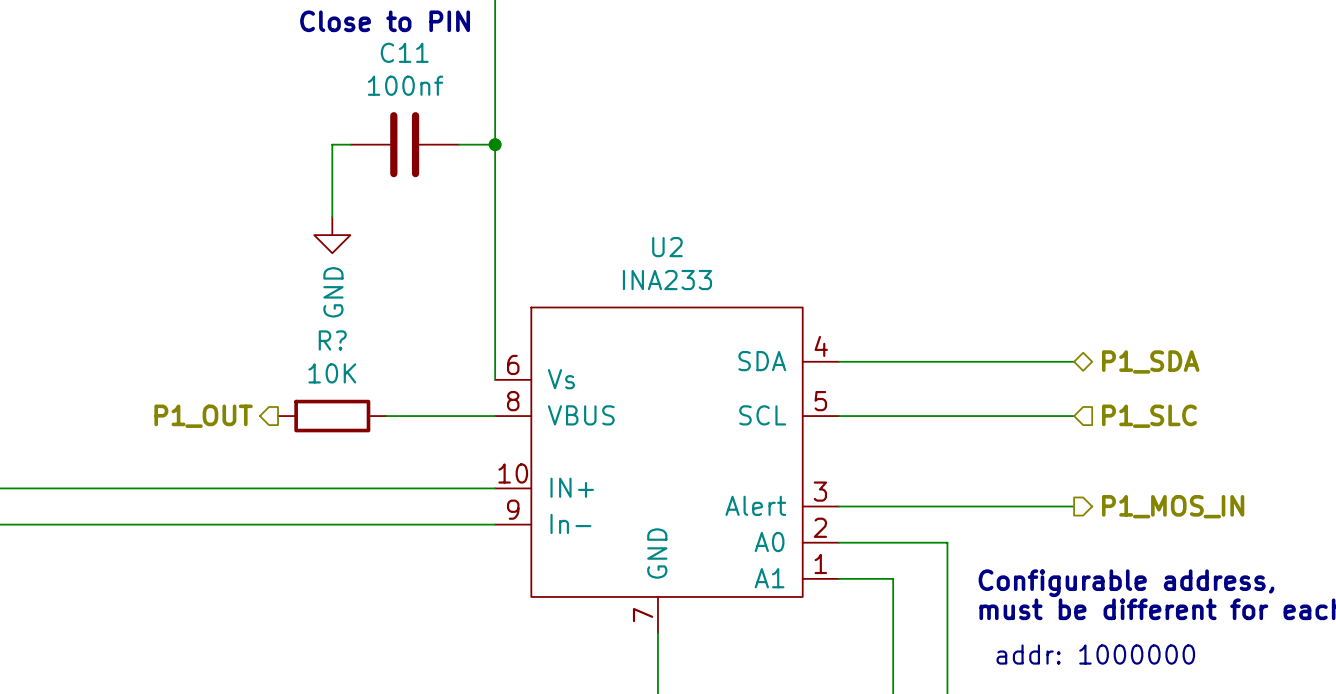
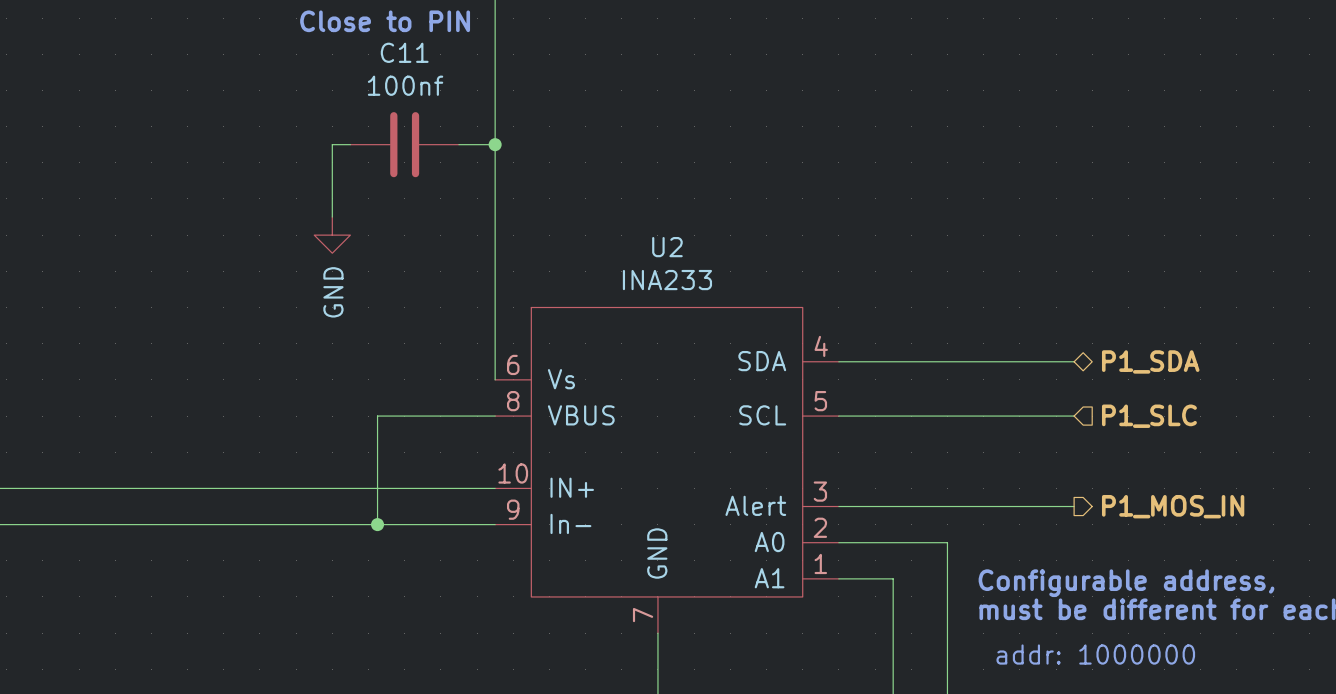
hierarchical label: P1_OUT (203, 416) -> none
R?: 10K (332, 416) -> none
wire: none -> (386, 416) (377, 416) (377, 524)
junction: none -> (377, 524)

